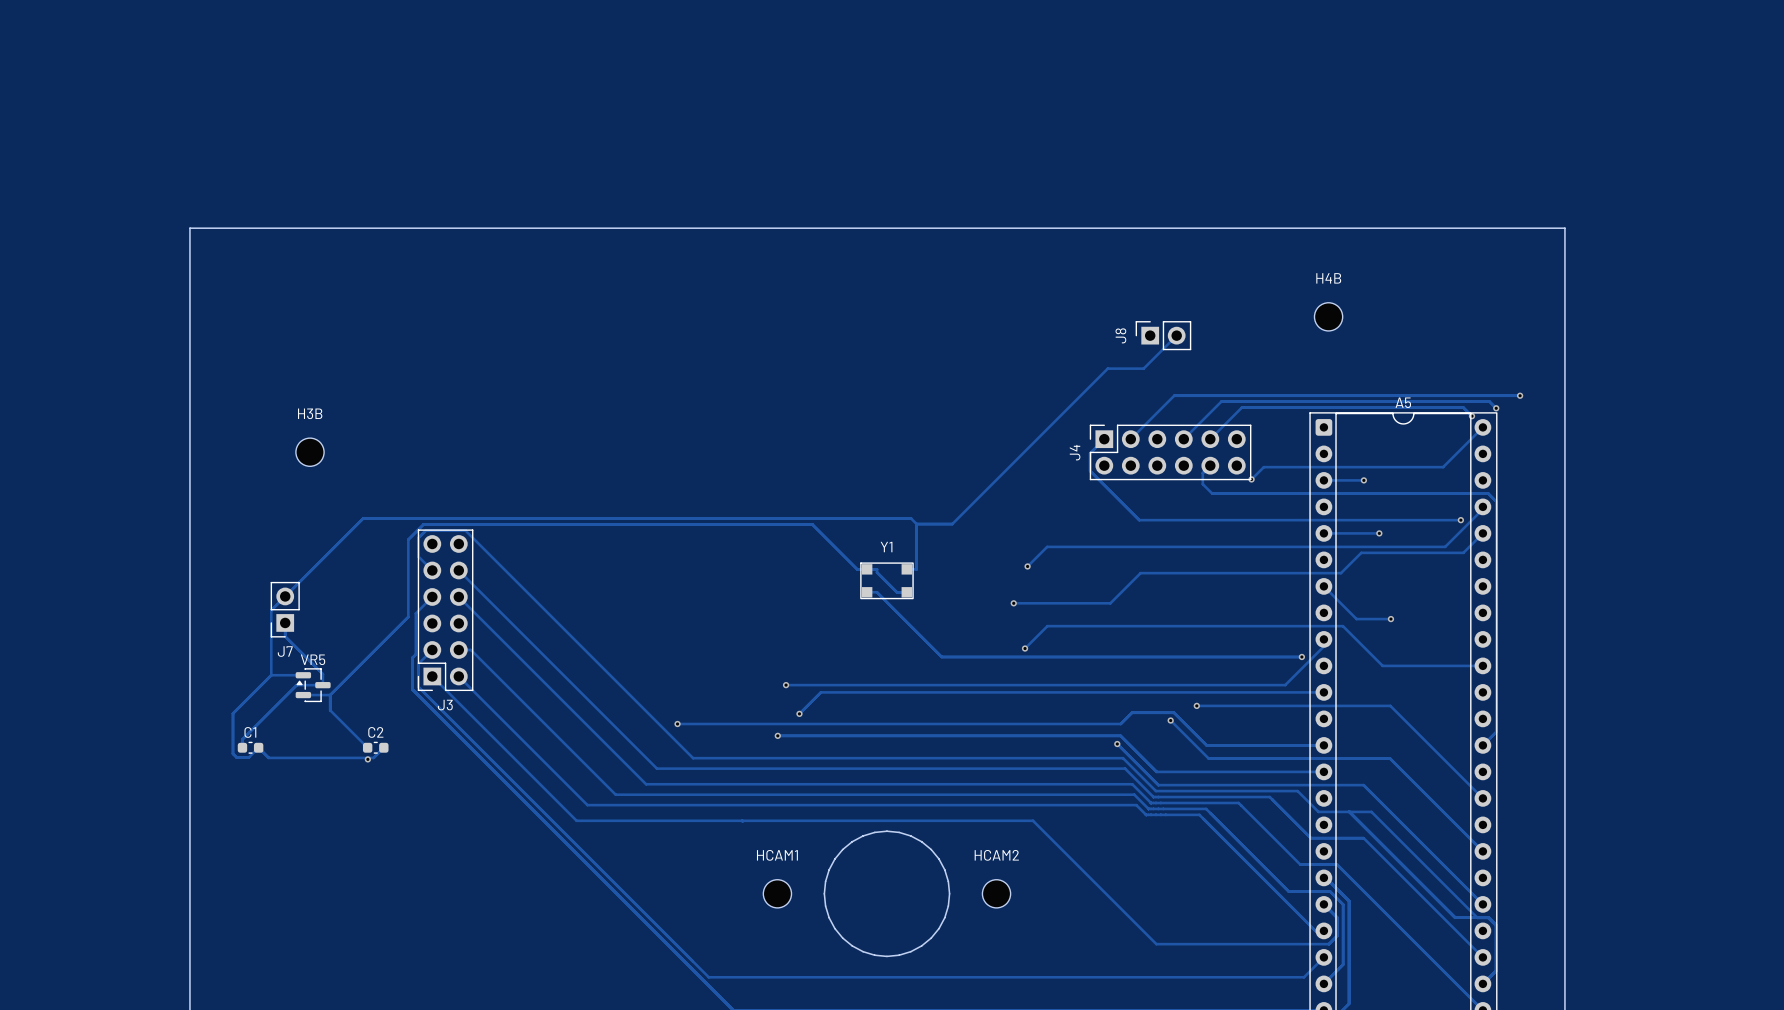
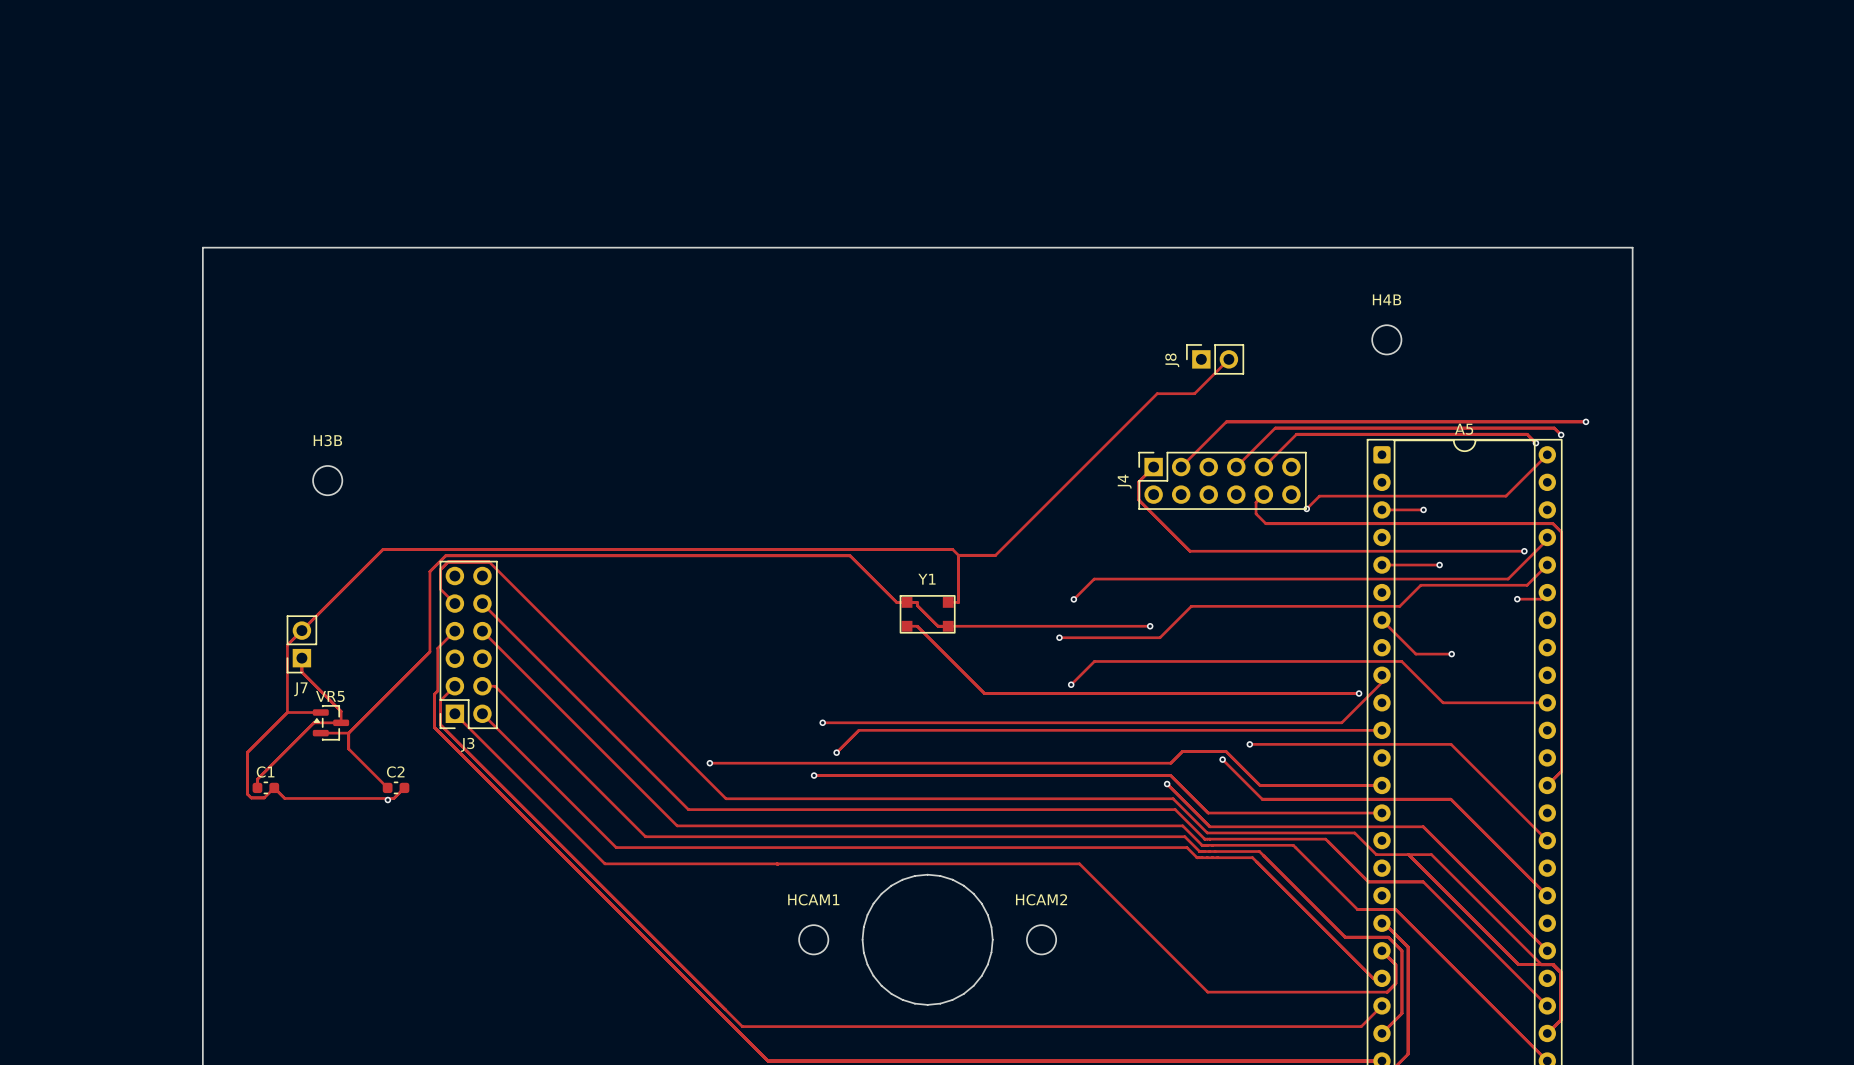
track: none -> (1547, 592) (1540, 599) (1517, 599)
via: none -> (1517, 599)
track: none -> (948, 626) (1150, 626)
via: none -> (1150, 626)

